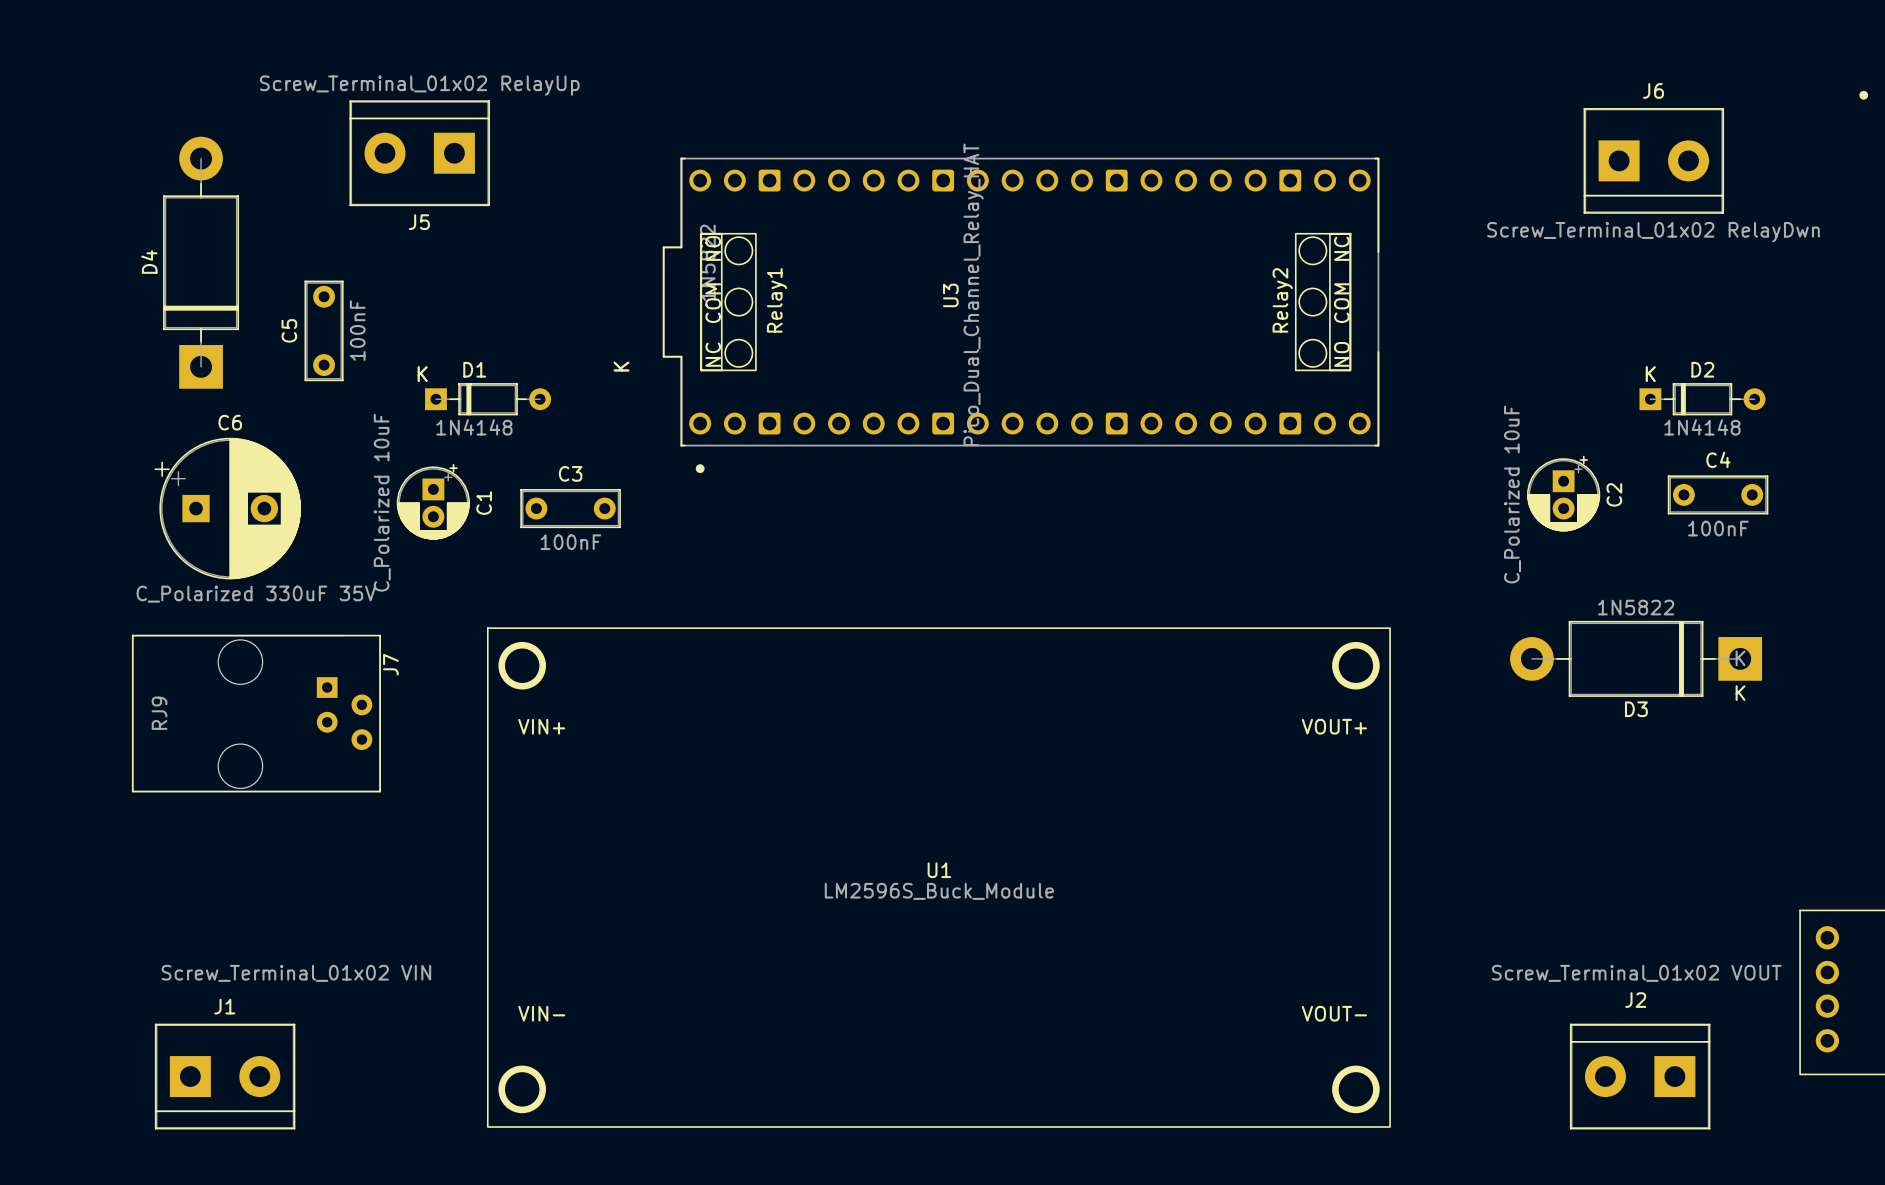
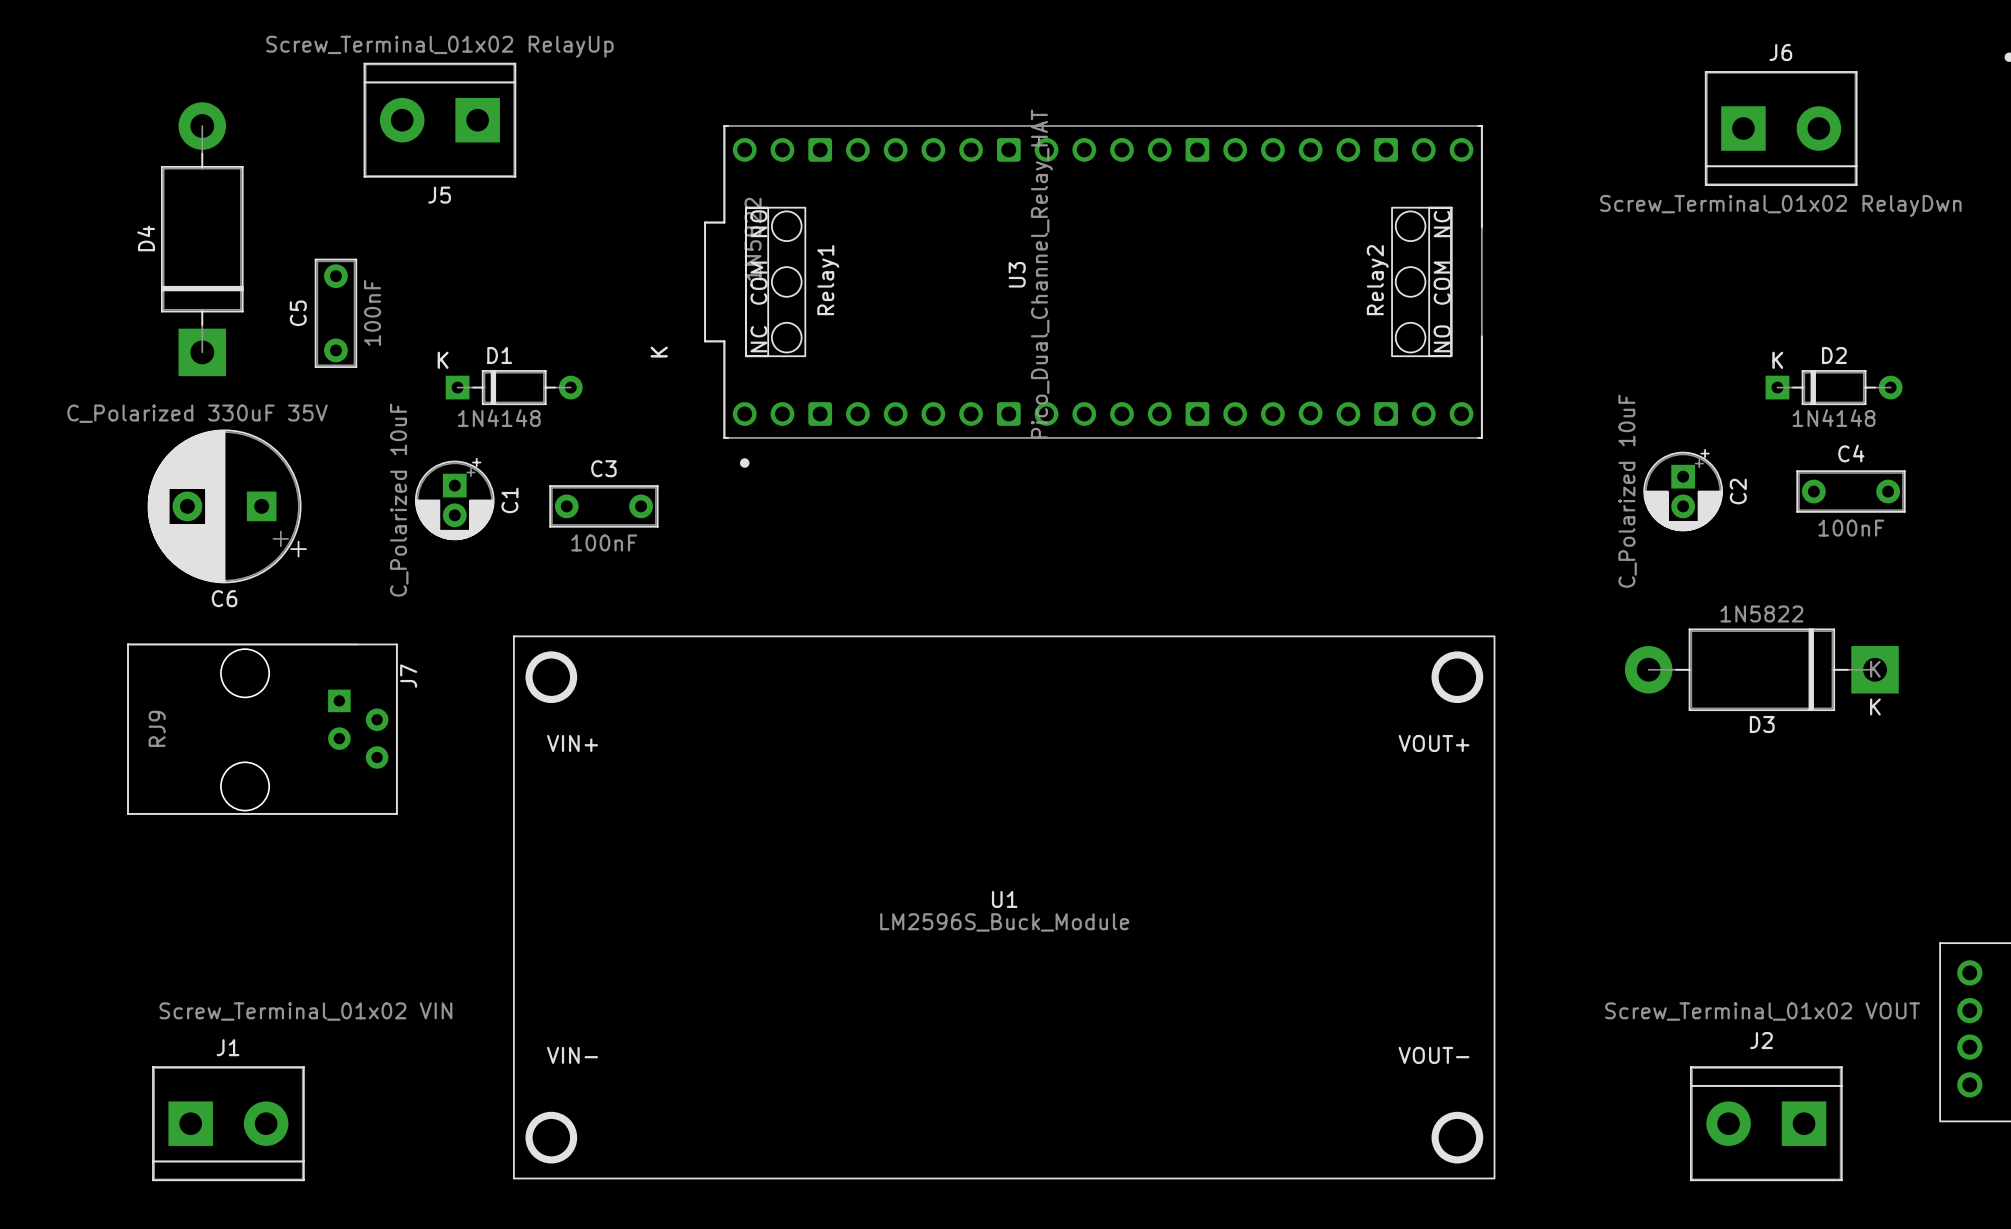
C6 rotation: 0° (227, 508) -> 180° (227, 506)

